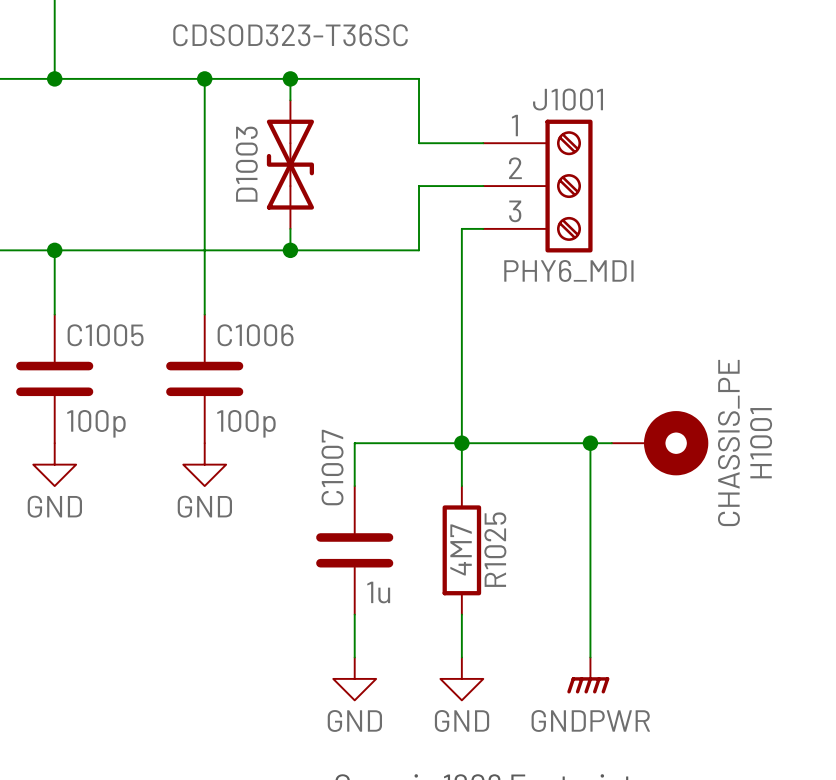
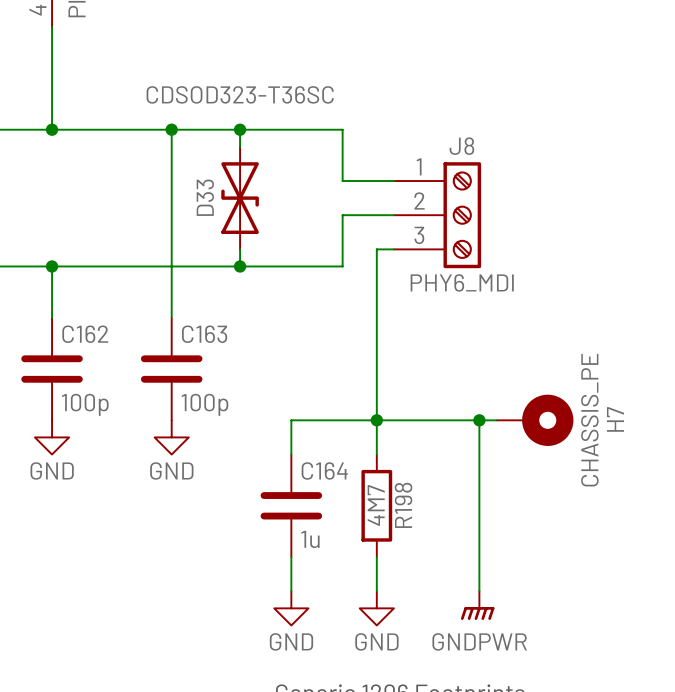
J1001 name: J1001 (568, 99) -> J8 (461, 146)
D1003 name: D1003 (246, 164) -> D33 (205, 197)
C1005 name: C1005 (105, 335) -> C162 (85, 334)
C1006 name: C1006 (255, 335) -> C163 (204, 334)
H1001 name: H1001 (761, 443) -> H7 (615, 419)
C1007 name: C1007 (332, 467) -> C164 (324, 470)
R1025 name: R1025 (495, 549) -> R198 (403, 505)

